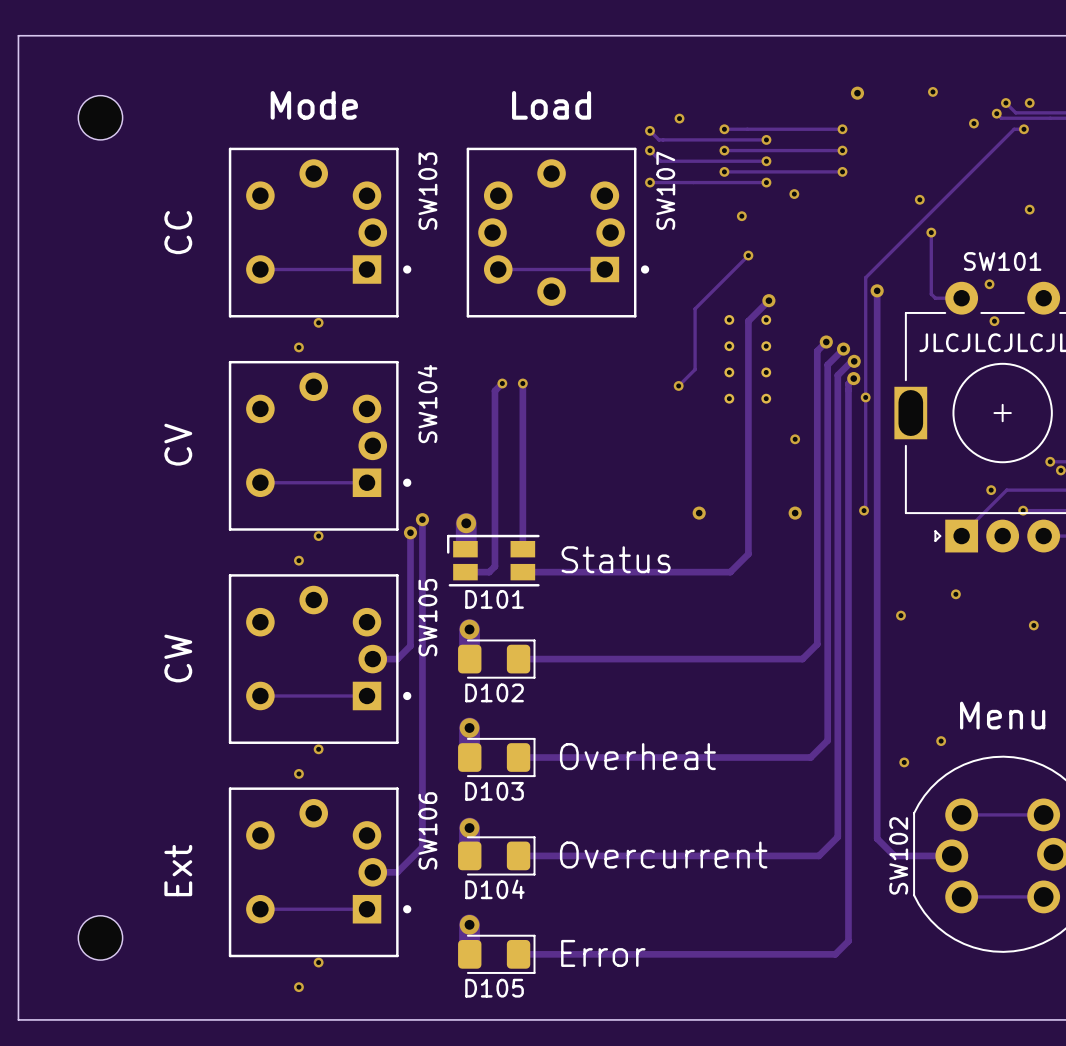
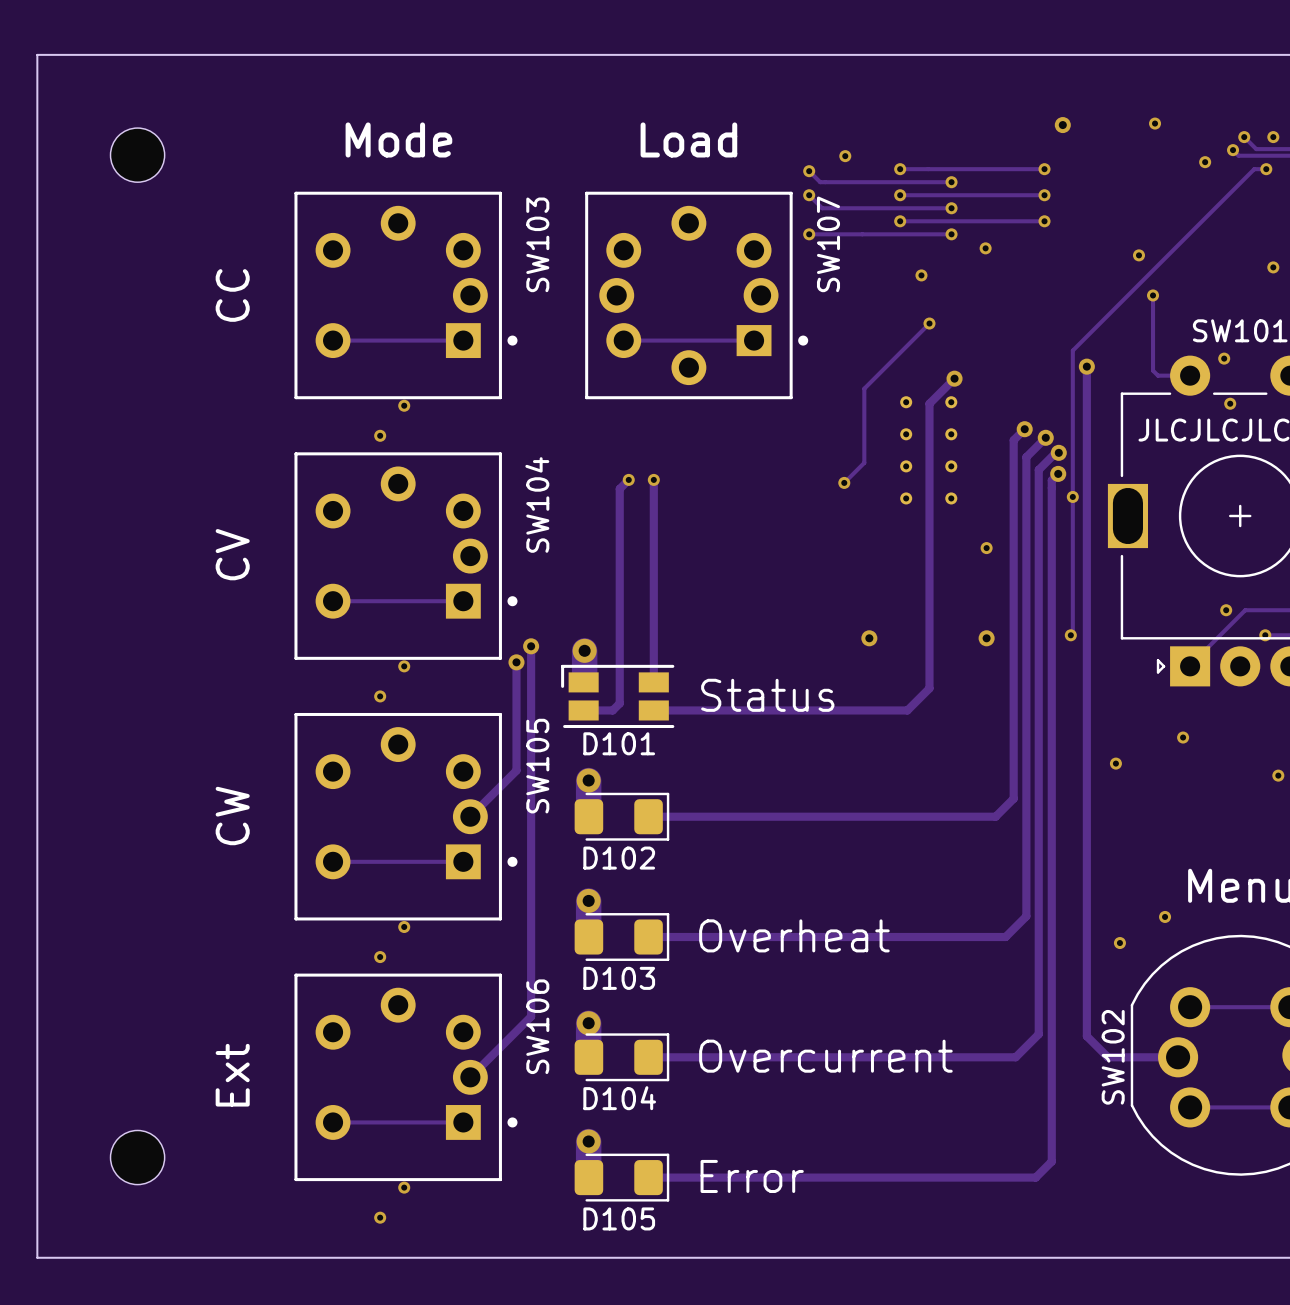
track: (410, 621) (410, 645) (397, 659) (372, 659) -> (516, 770) (470, 816)
track: (422, 822) (422, 847) (397, 872) (372, 872) -> (531, 1016) (470, 1077)

